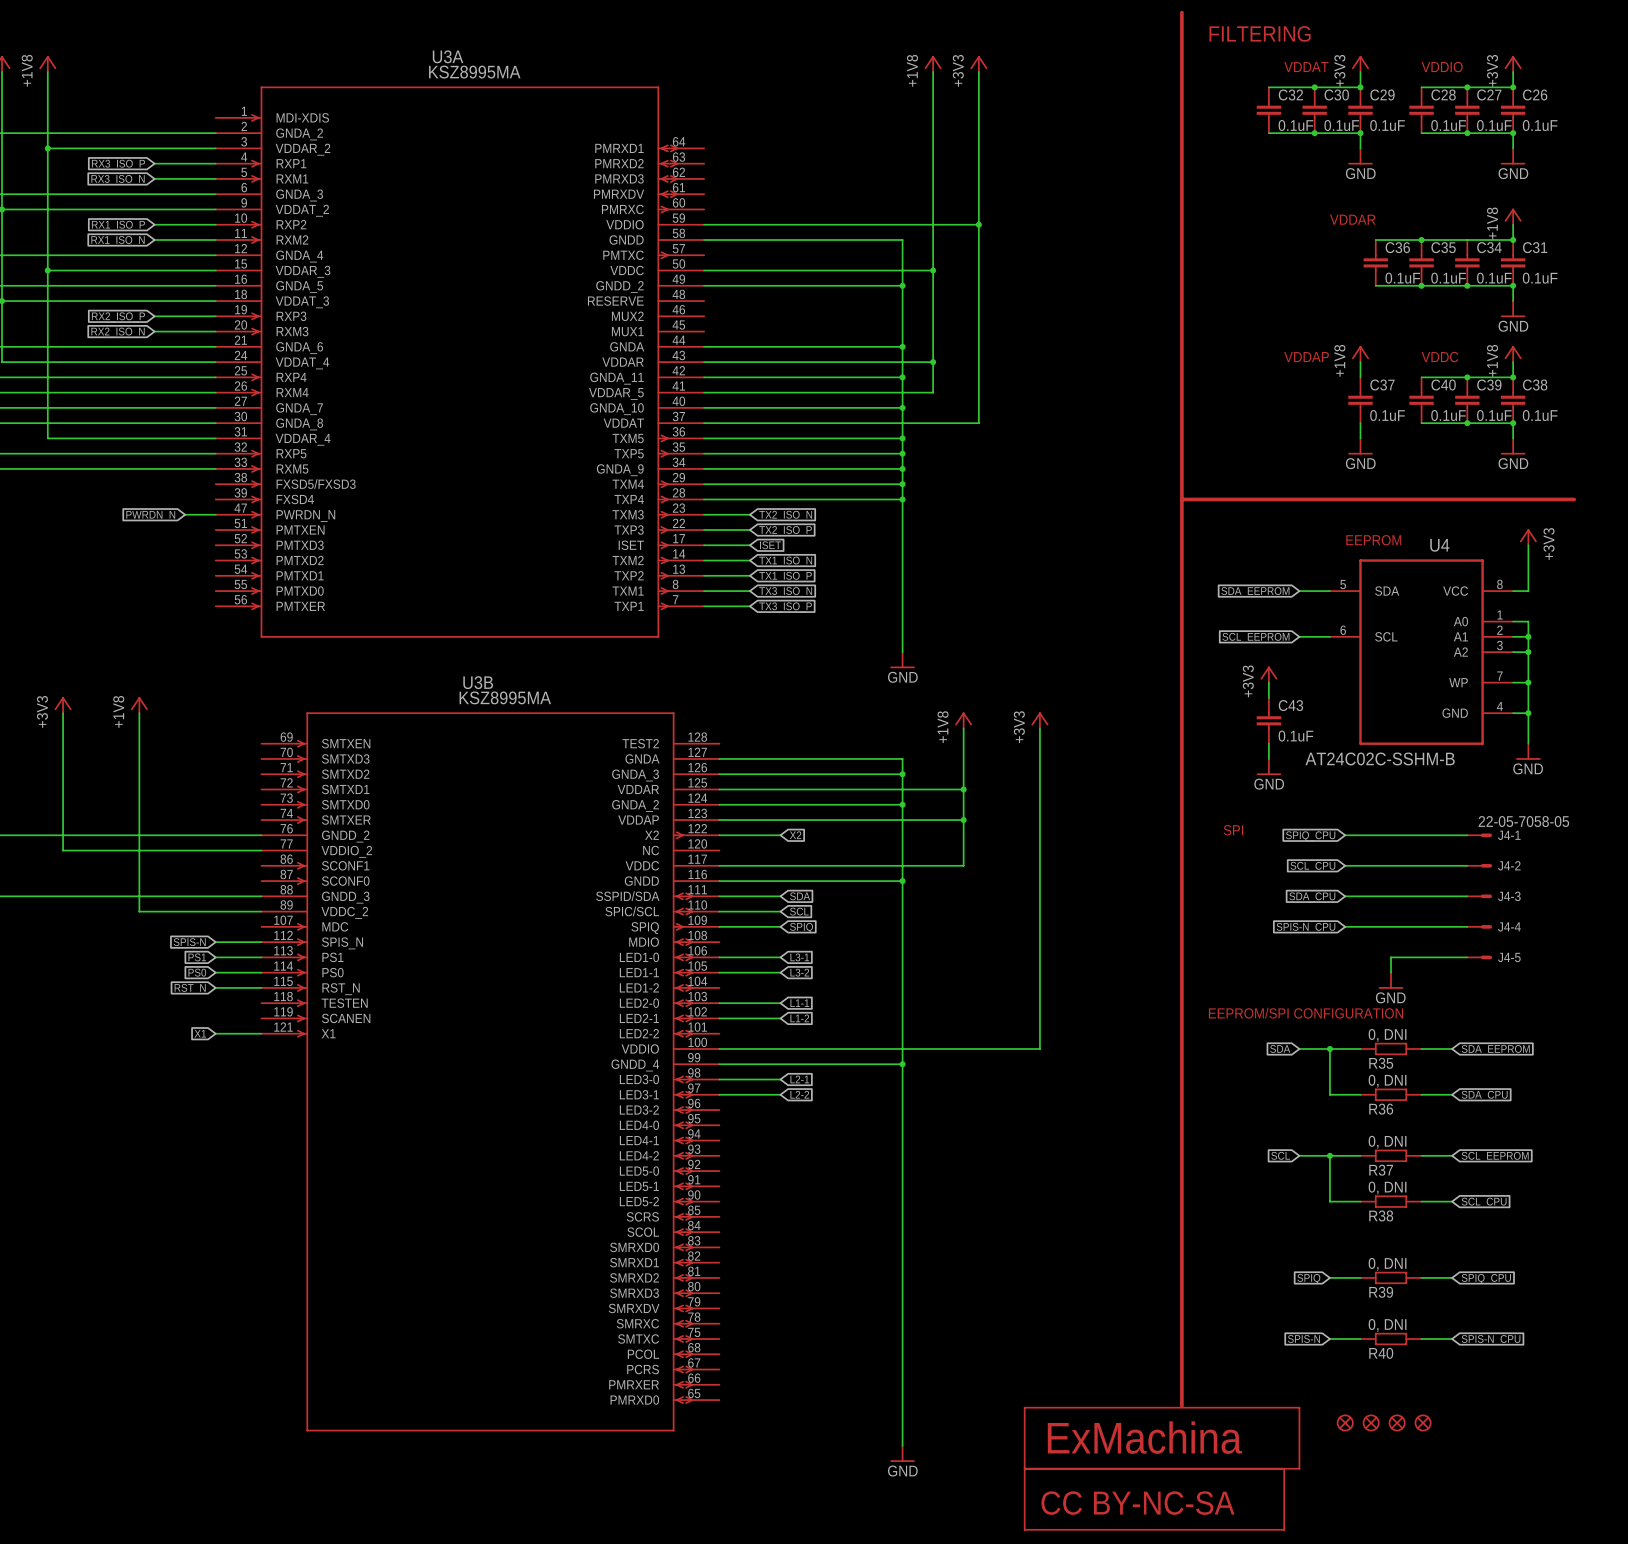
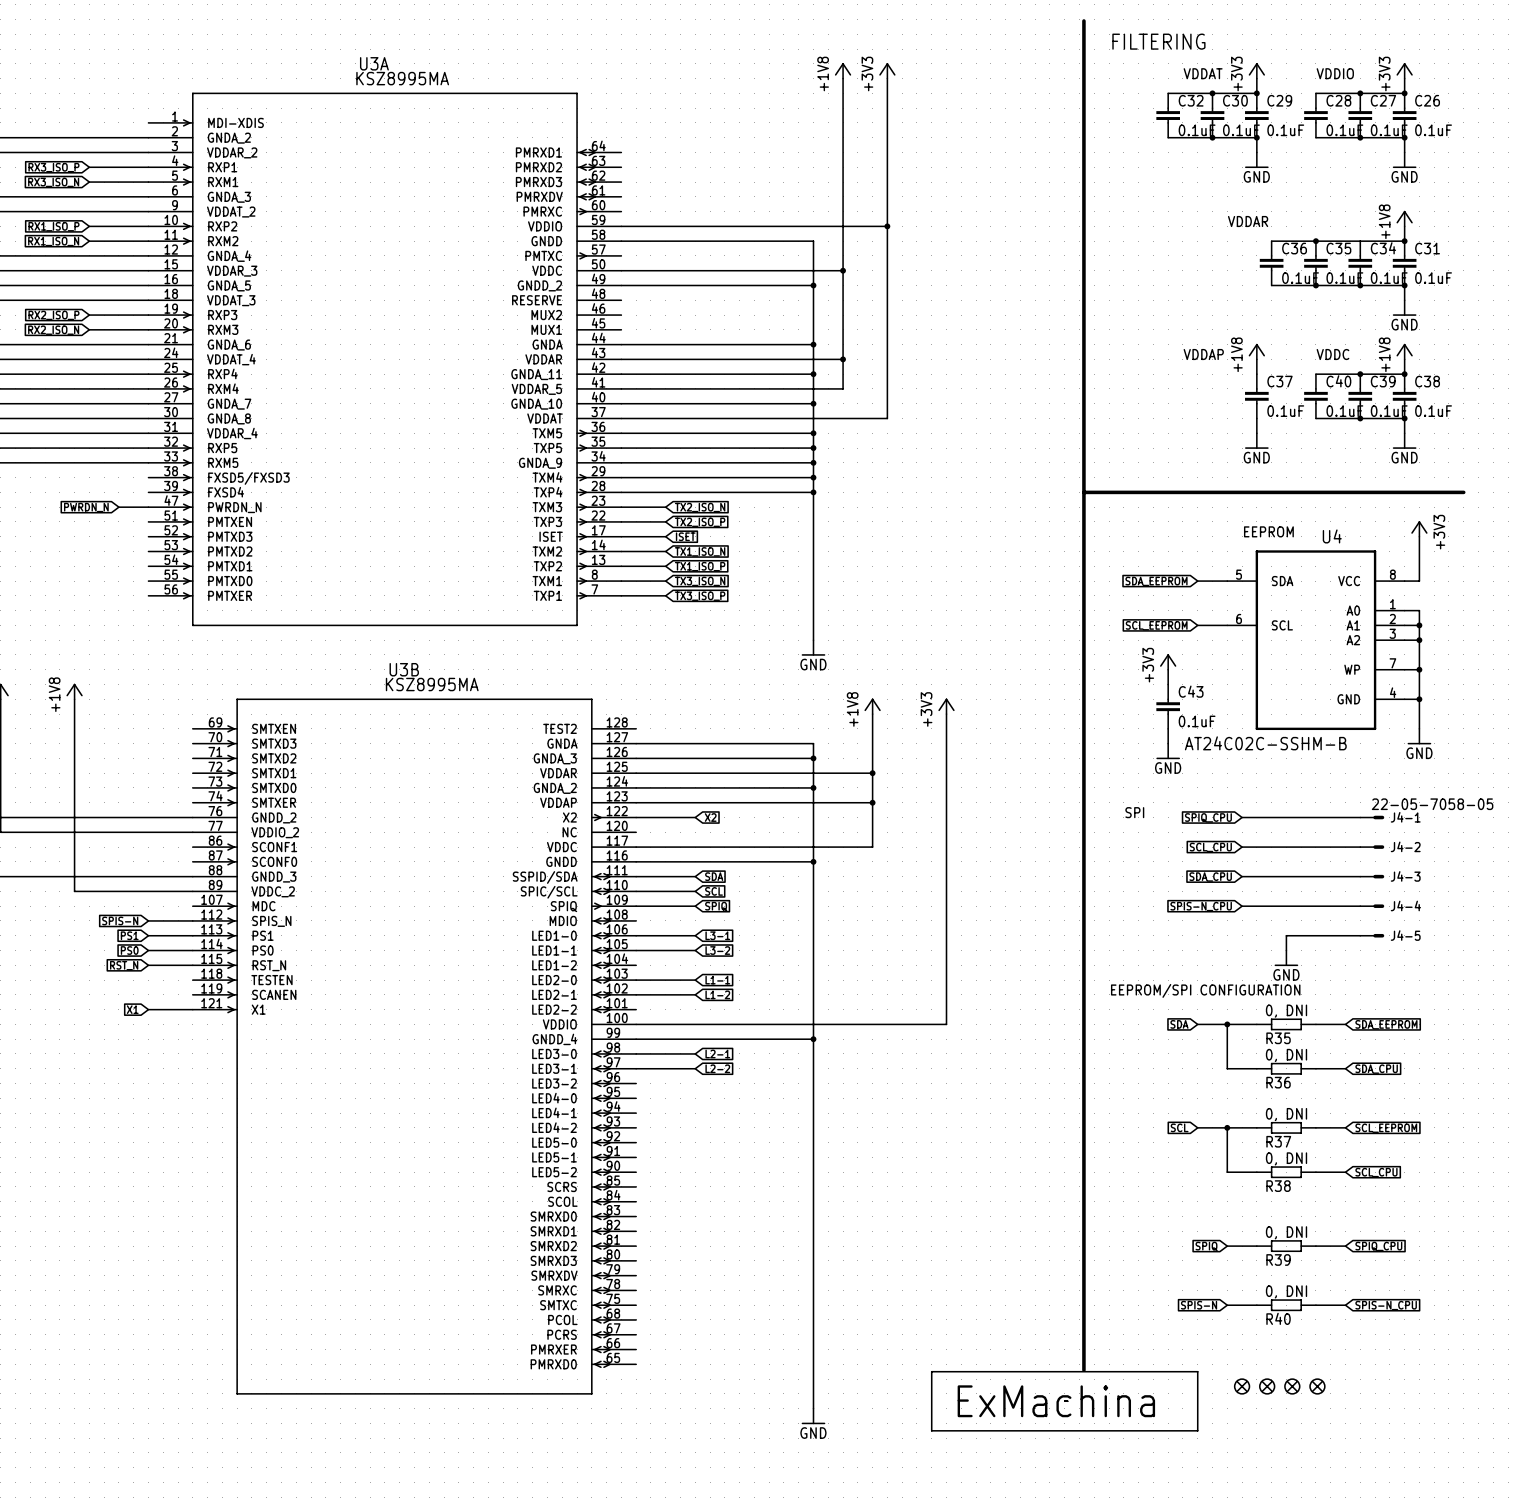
part: (1154, 1499) -> none

